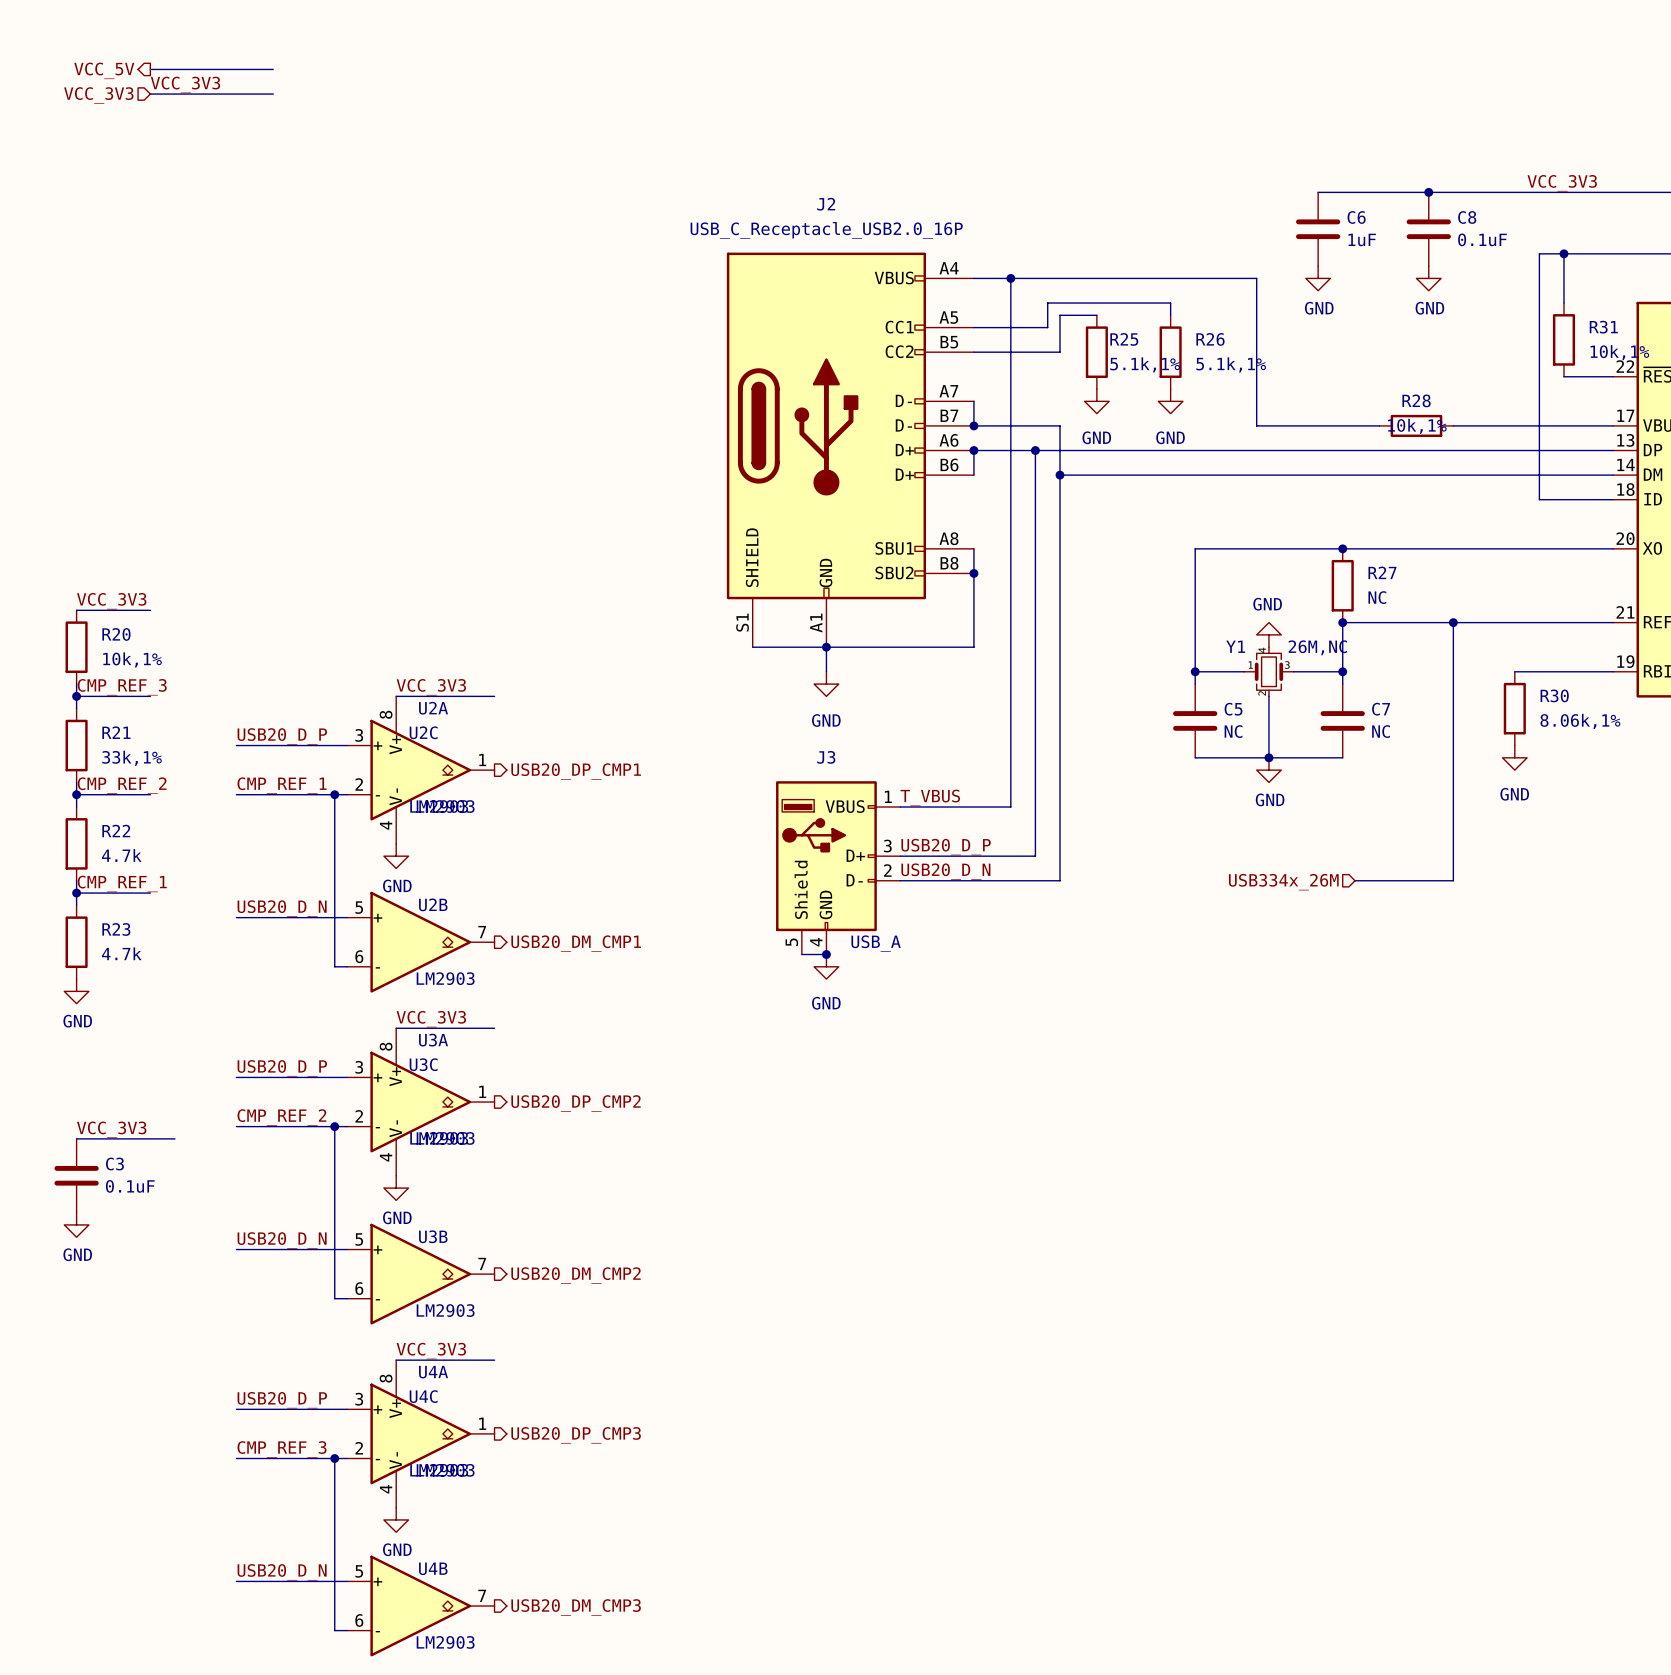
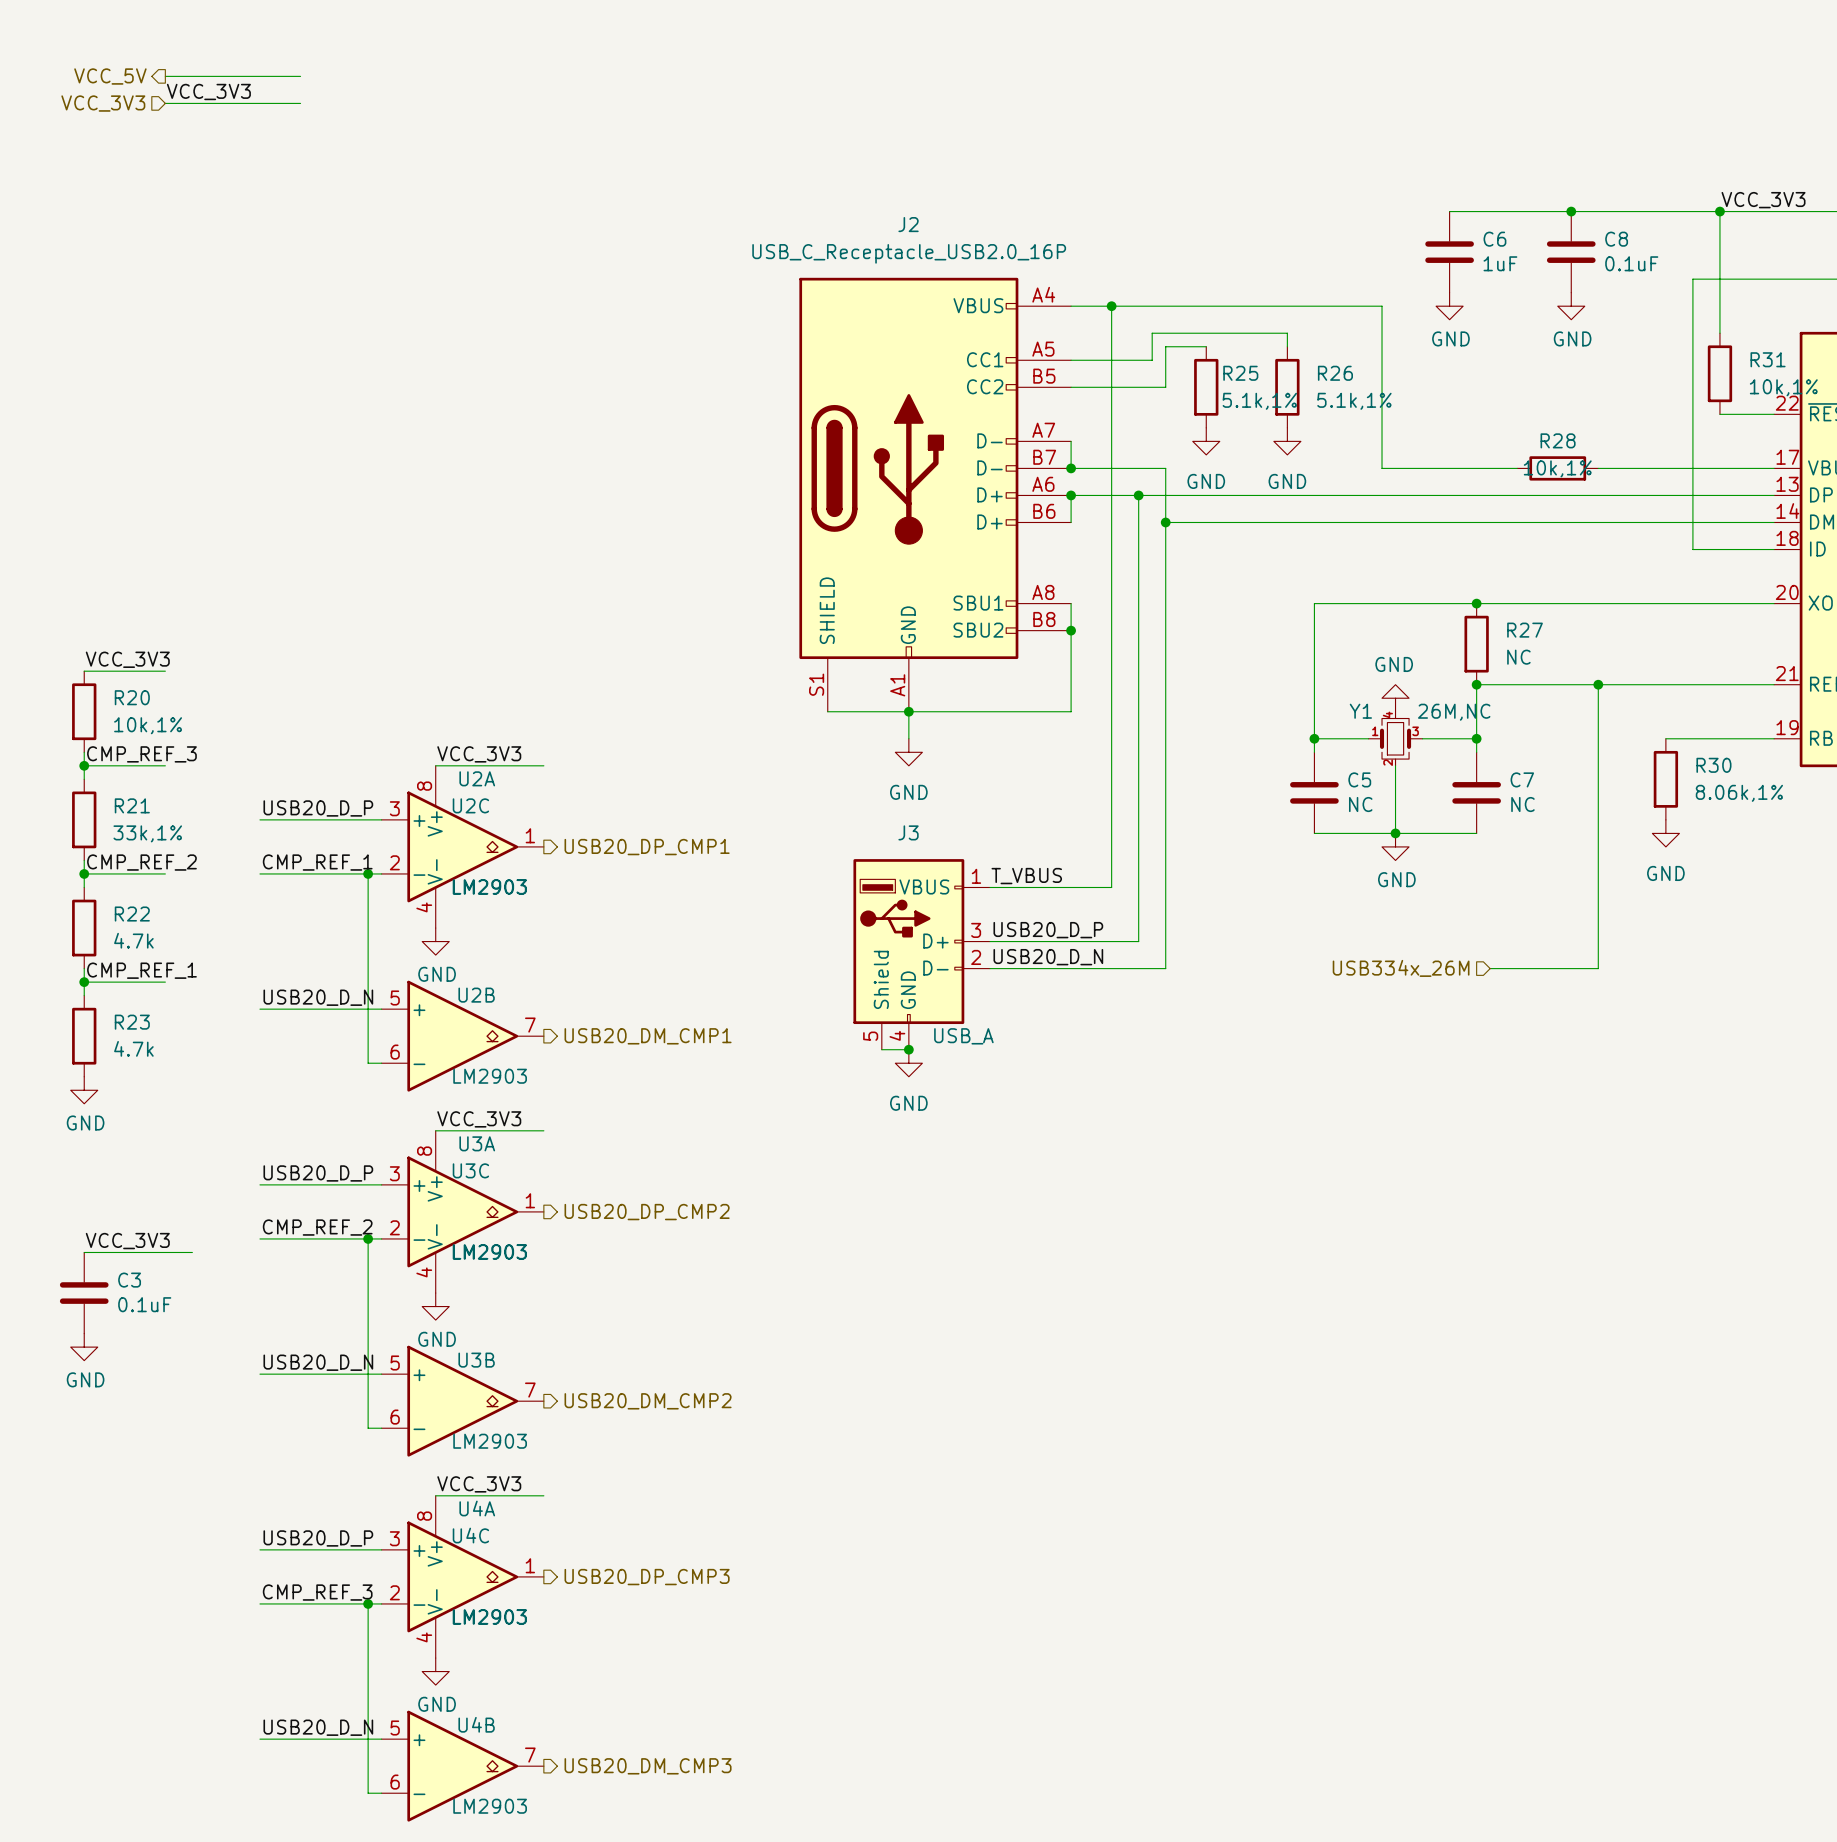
label position: VCC_3V3 (1562, 183) -> VCC_3V3 (1763, 200)
wire: none -> (1719, 211) (1719, 279)
junction: none -> (1719, 211)
junction: (1563, 253) -> none

